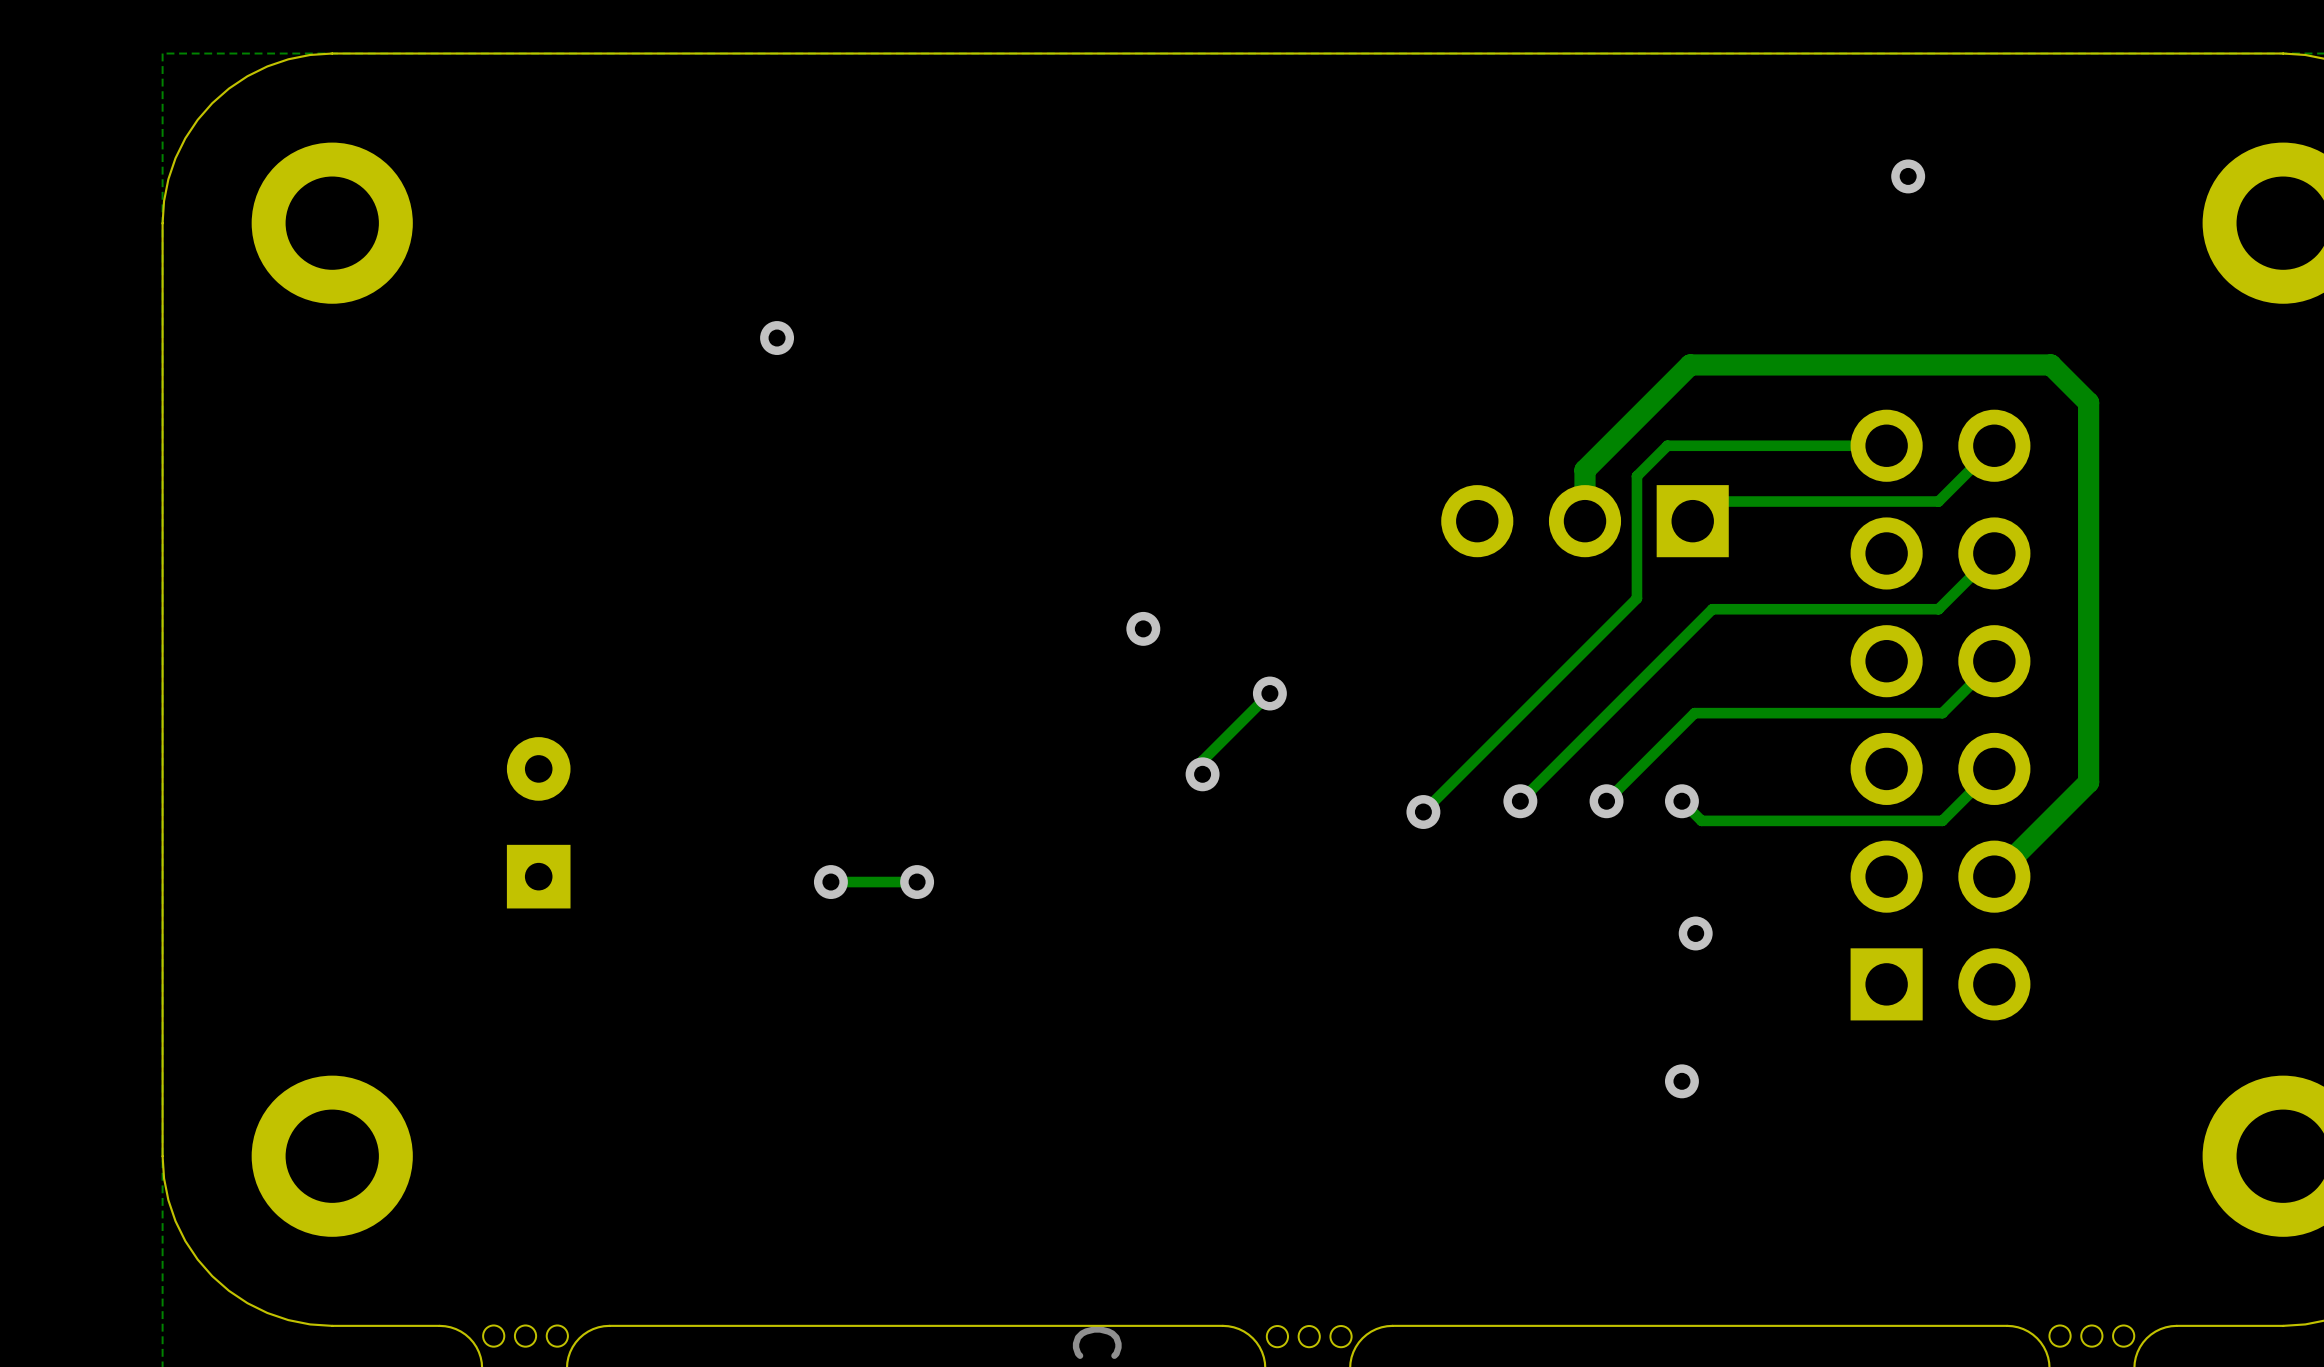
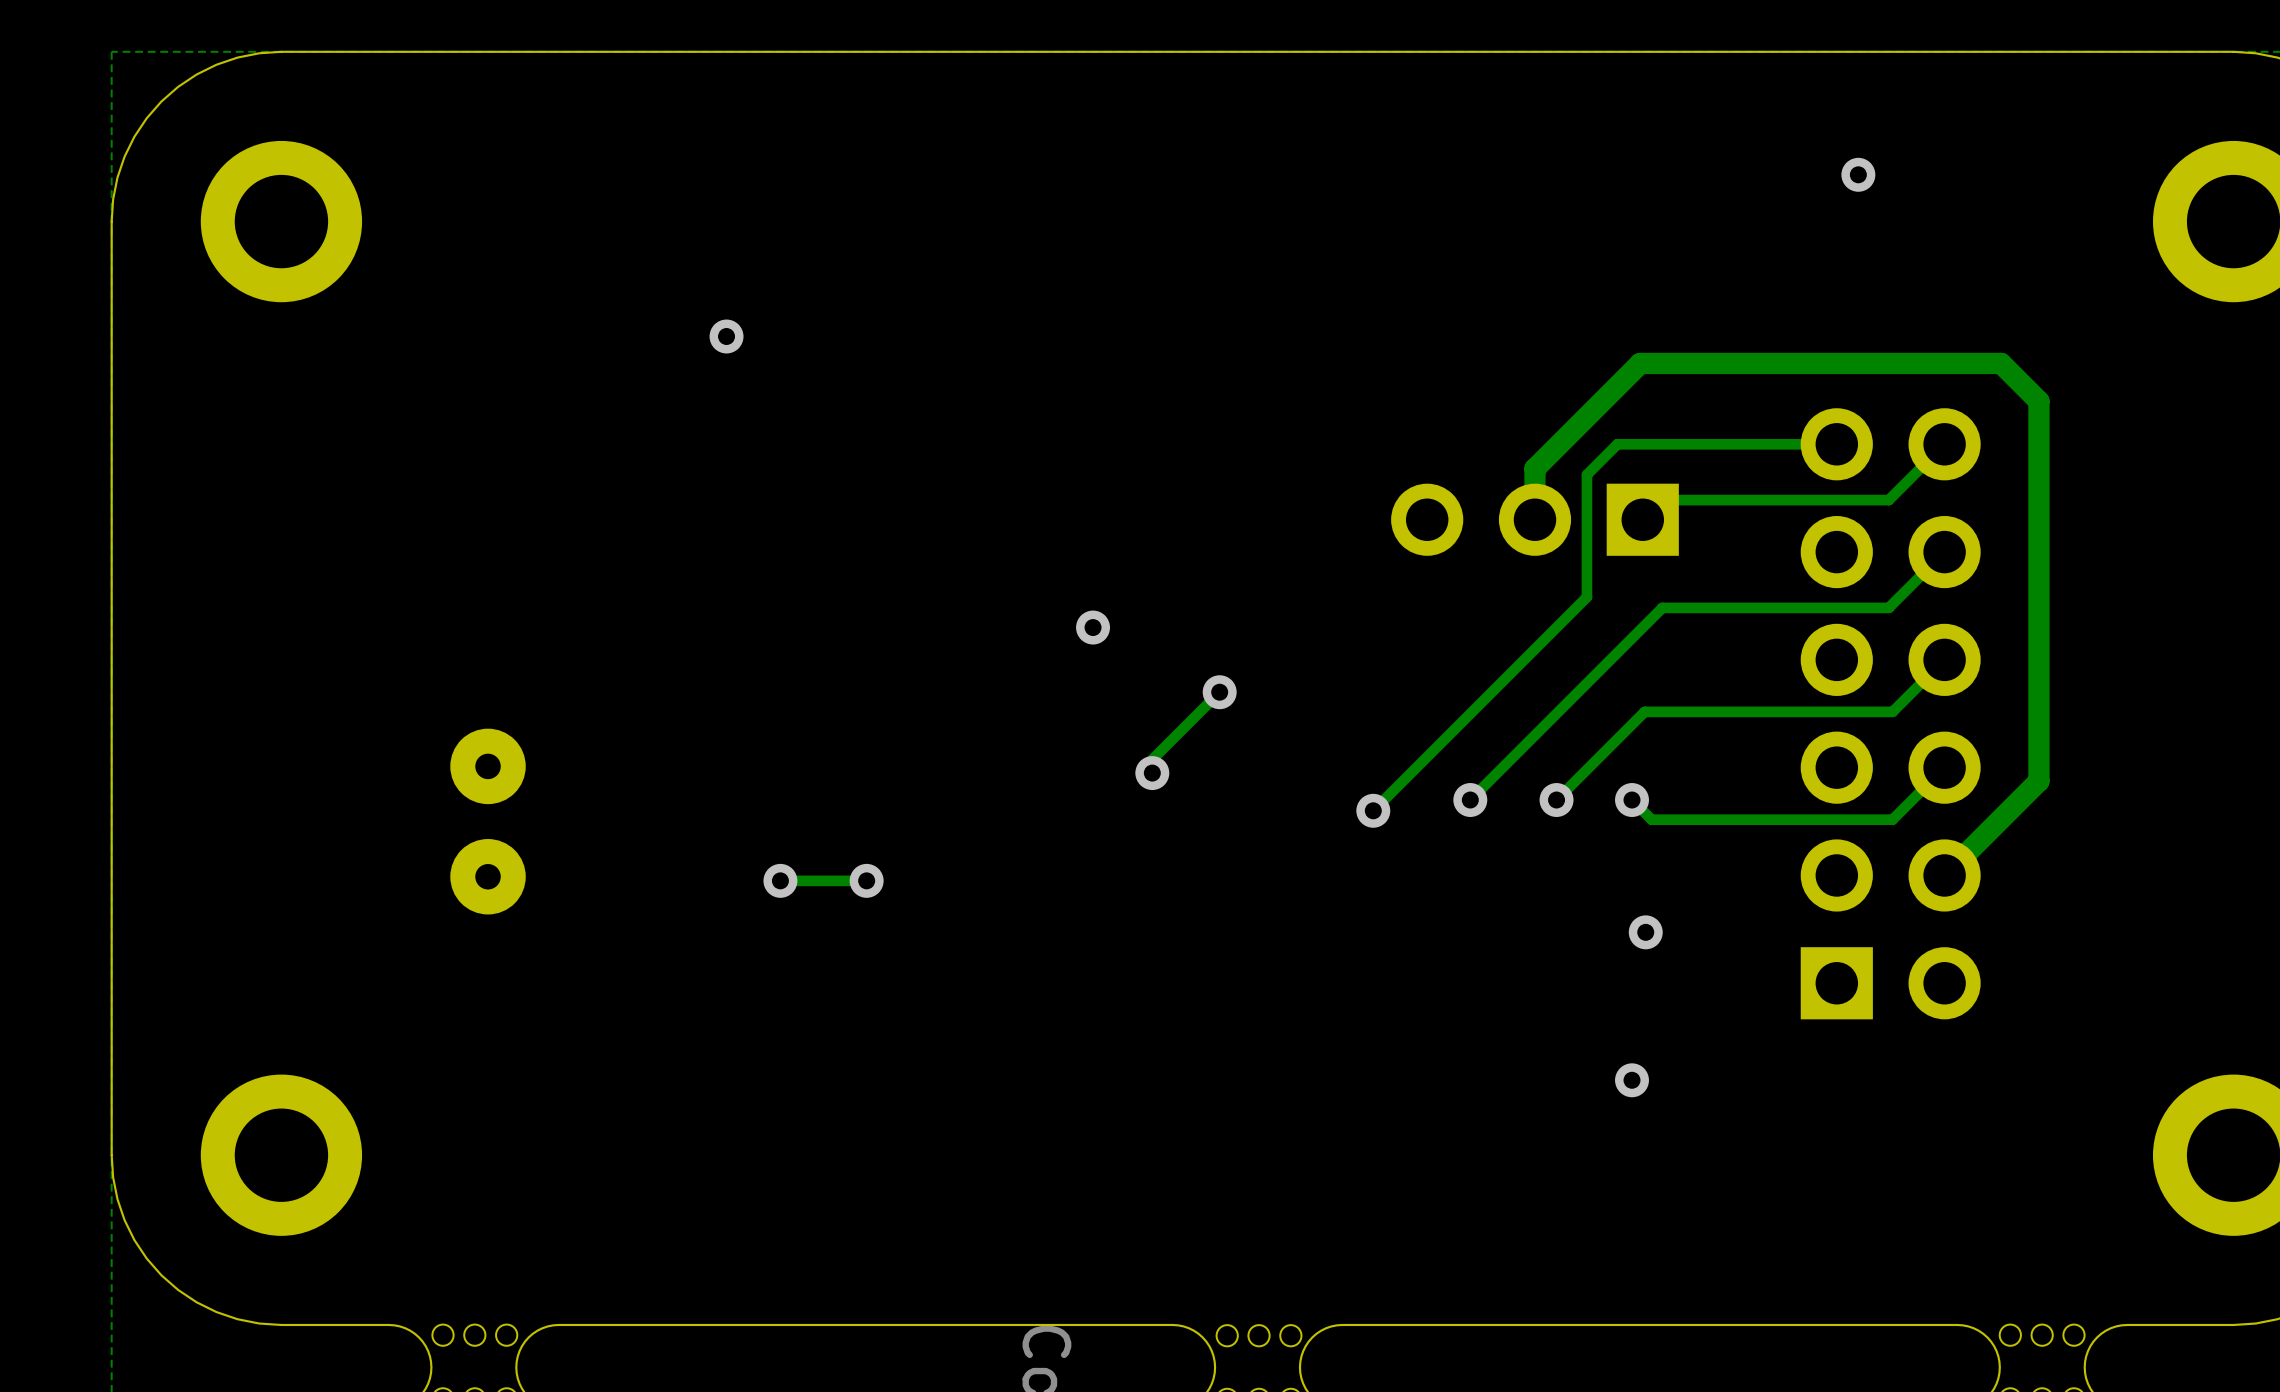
part footprint: [506, 737, 571, 909] -> [450, 728, 526, 915]

